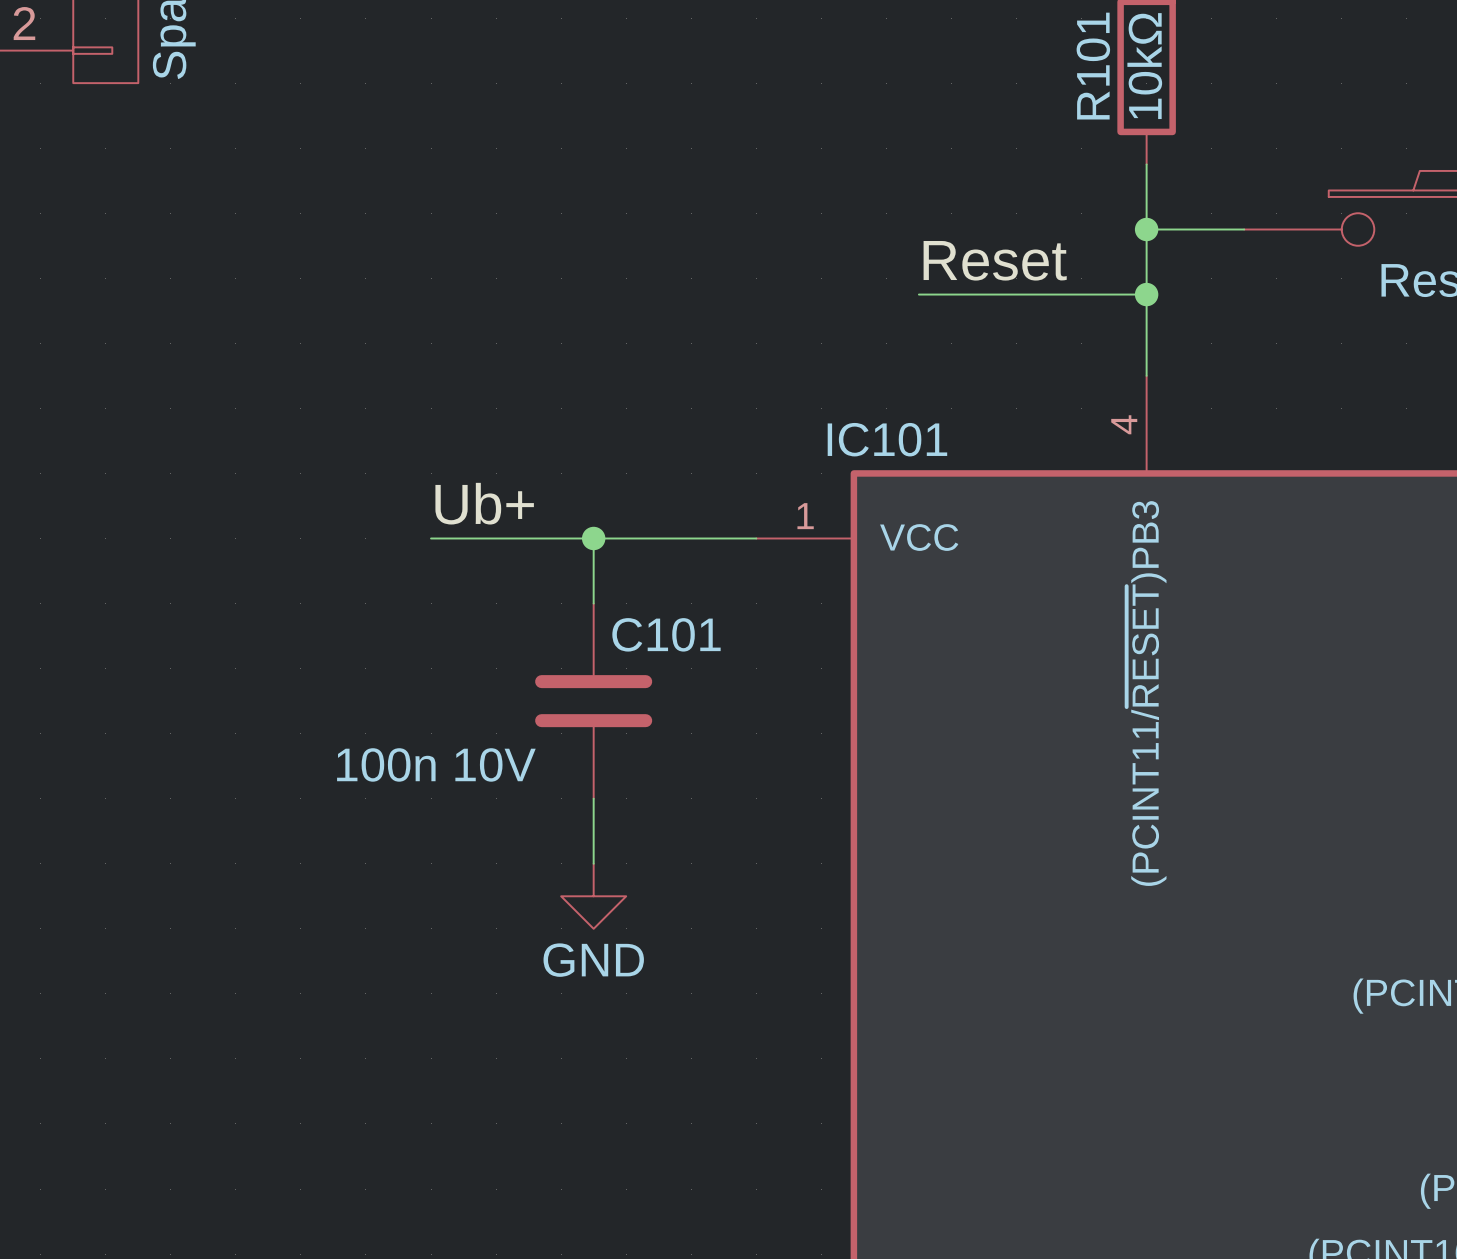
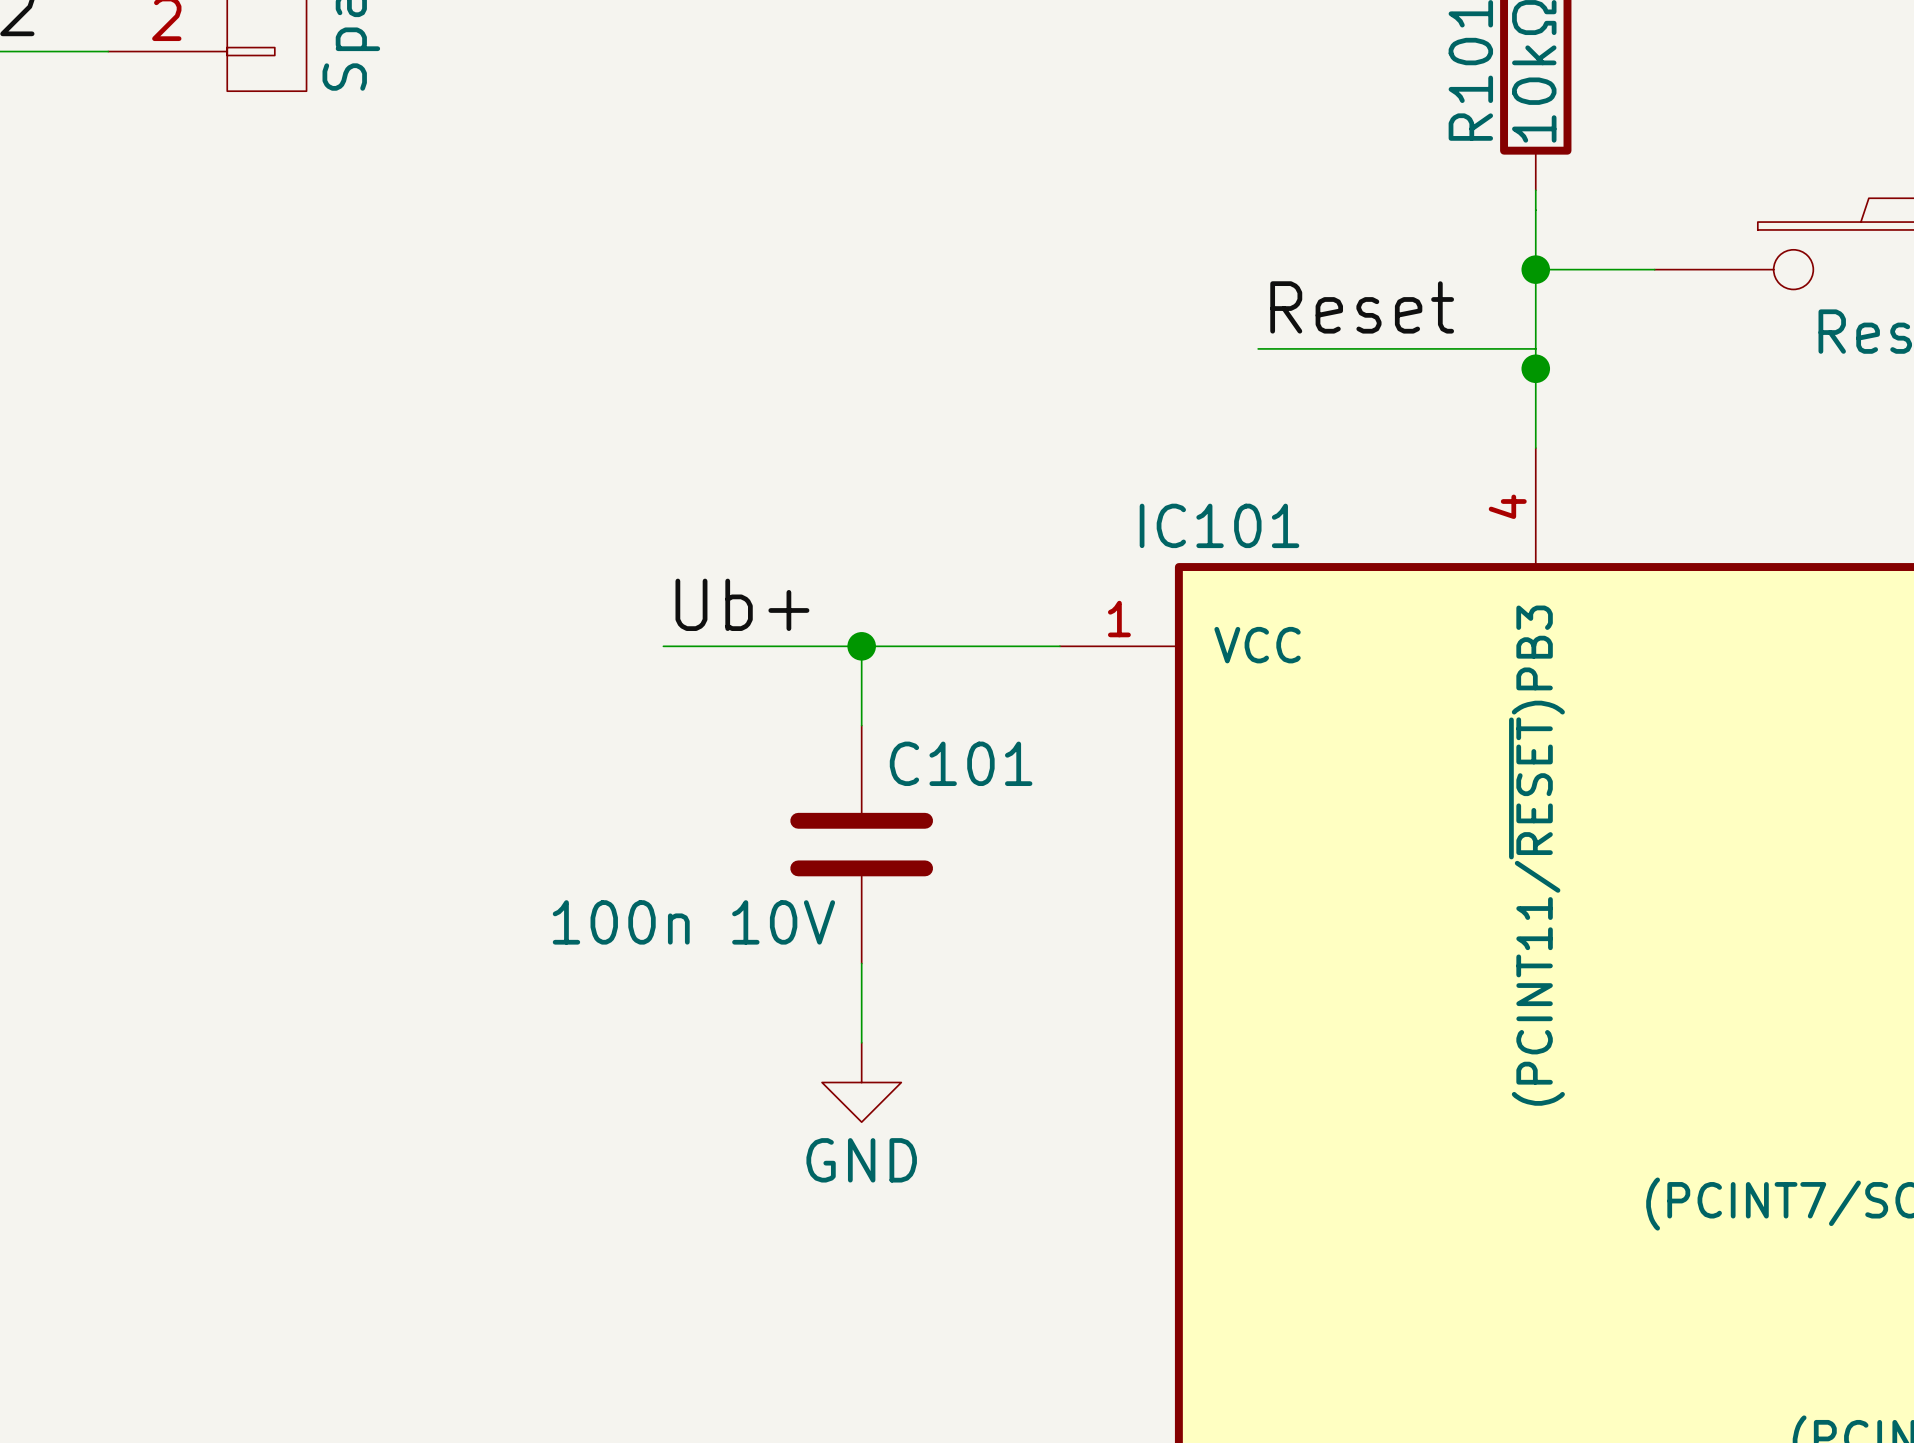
junction position: (1146, 294) -> (1535, 368)

